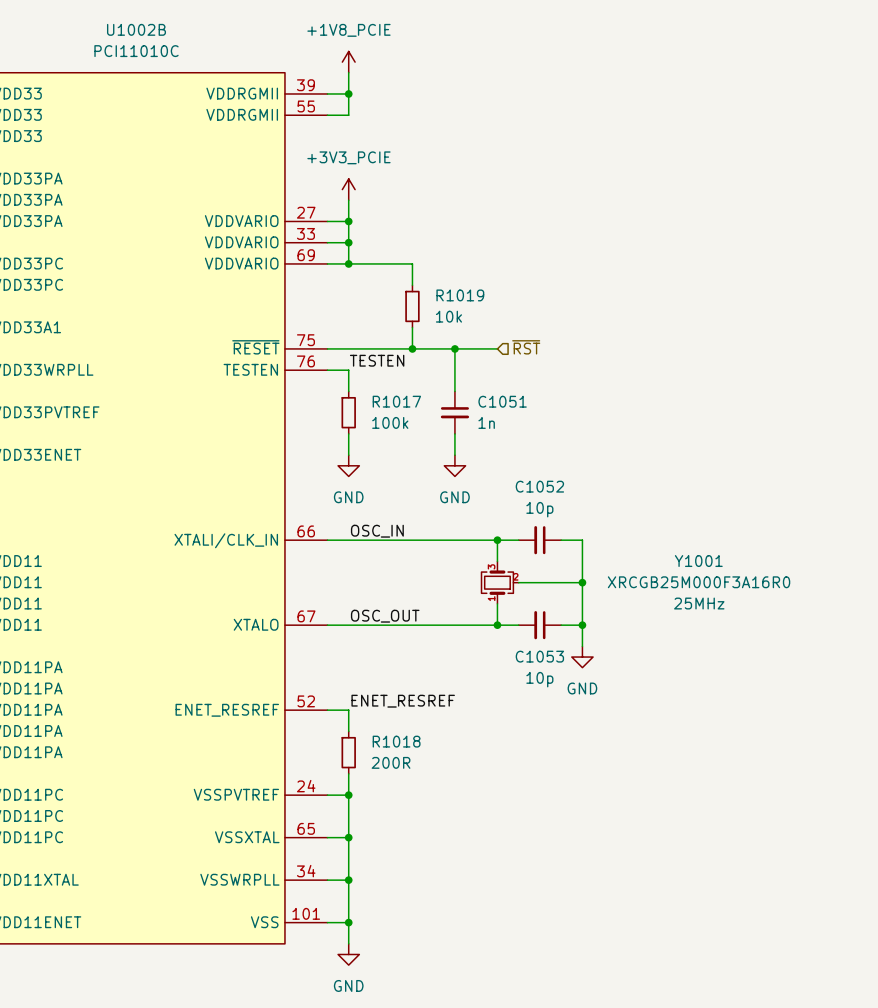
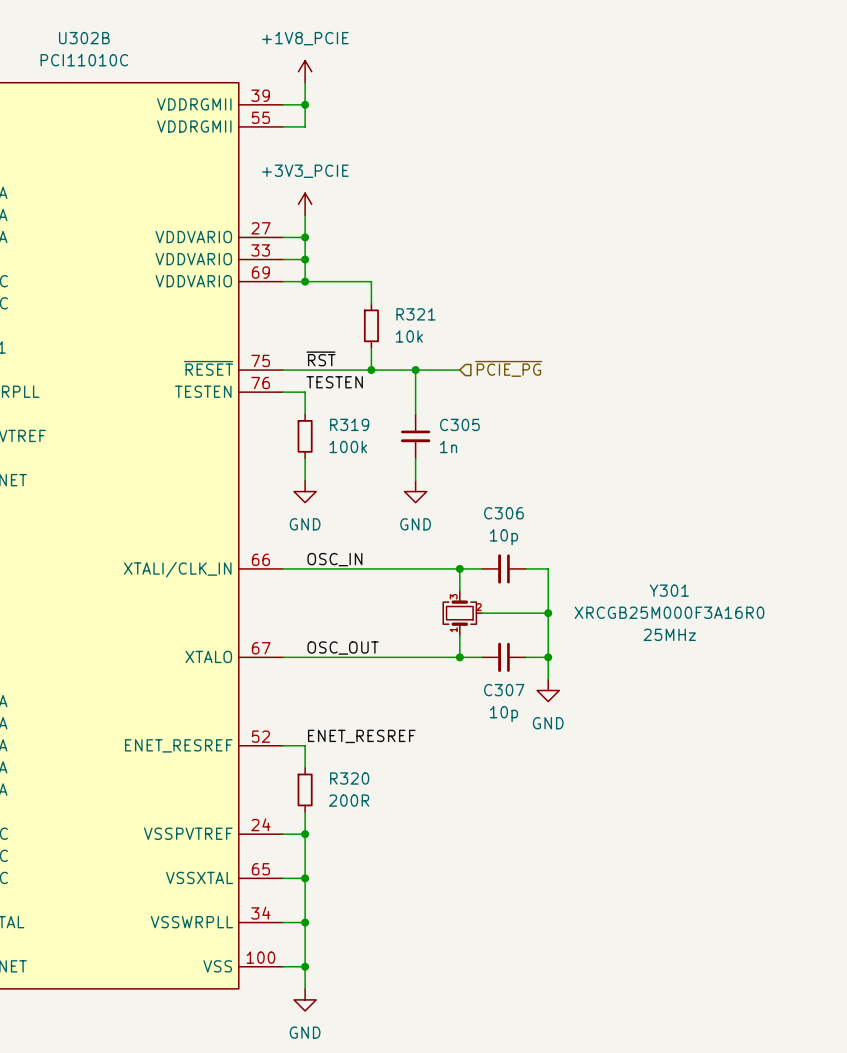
U1002B name: U1002B (136, 29) -> U302B (84, 38)
R1019 name: R1019 (460, 295) -> R321 (415, 314)
label: none -> ~{RST} (321, 358)
hierarchical label: ~{RST} (526, 347) -> ~{PCIE_PG} (508, 368)
R1017 name: R1017 (396, 401) -> R319 (349, 424)
C1051 name: C1051 (502, 401) -> C305 (459, 424)
C1052 name: C1052 (539, 486) -> C306 (503, 513)
Y1001 name: Y1001 (698, 561) -> Y301 (669, 590)
C1053 name: C1053 (539, 656) -> C307 (504, 690)
R1018 name: R1018 (396, 741) -> R320 (349, 778)
U1002B pin number: 101 (306, 913) -> 100 (260, 957)

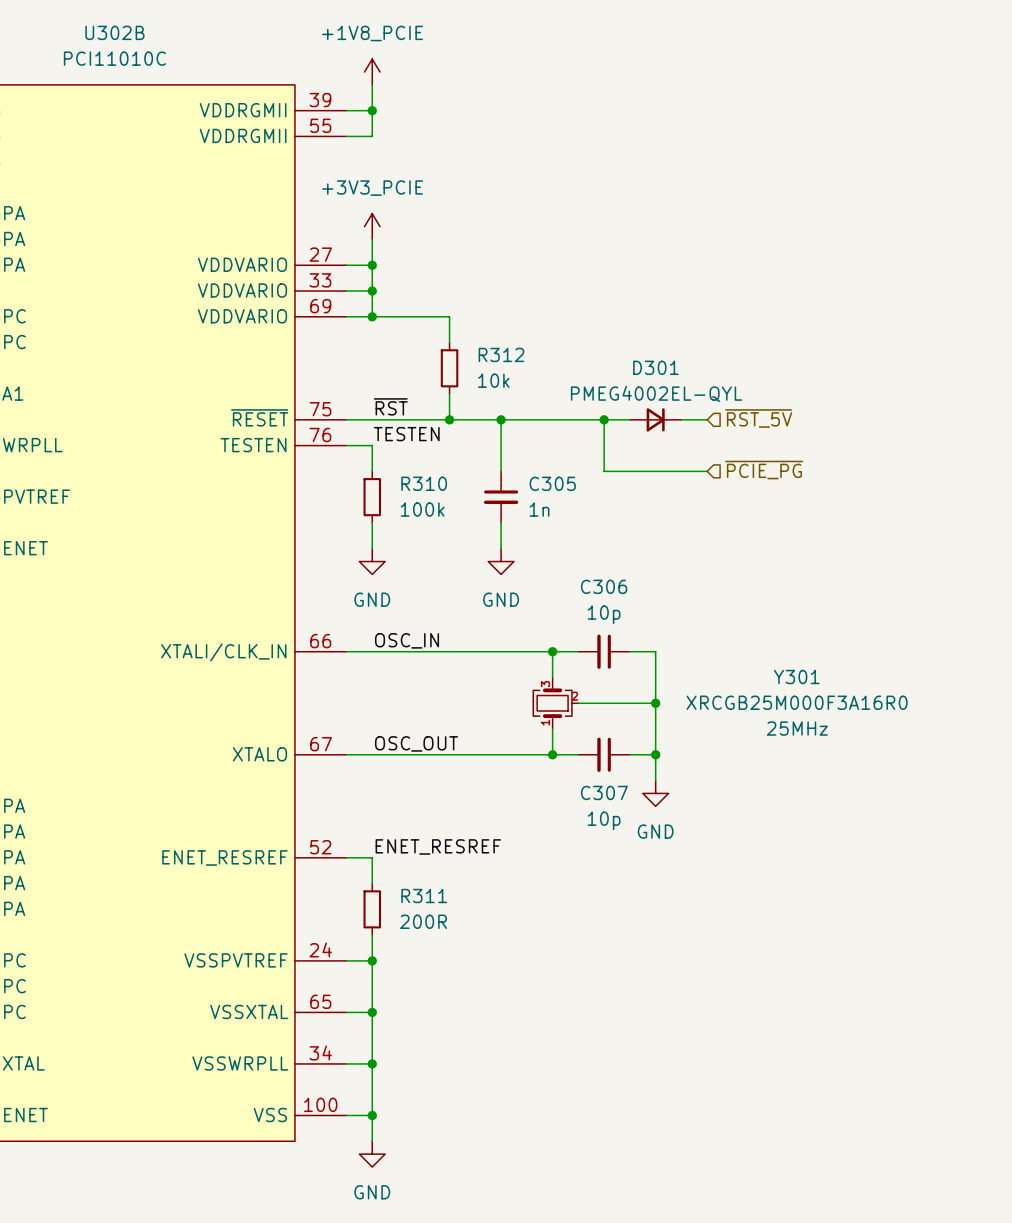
R321 name: R321 (415, 314) -> R312 (501, 354)
hierarchical label position: ~{PCIE_PG} (508, 368) -> ~{PCIE_PG} (764, 470)
hierarchical label: none -> ~{RST_5V} (758, 418)
wire: none -> (552, 419) (629, 419)
wire: none -> (604, 419) (604, 471) (707, 471)
junction: none -> (604, 419)
D301: none -> PMEG4002EL-QYL (655, 419)
wire: none -> (681, 419) (707, 419)
R319 name: R319 (349, 424) -> R310 (424, 483)
R320 name: R320 (349, 778) -> R311 (424, 896)

